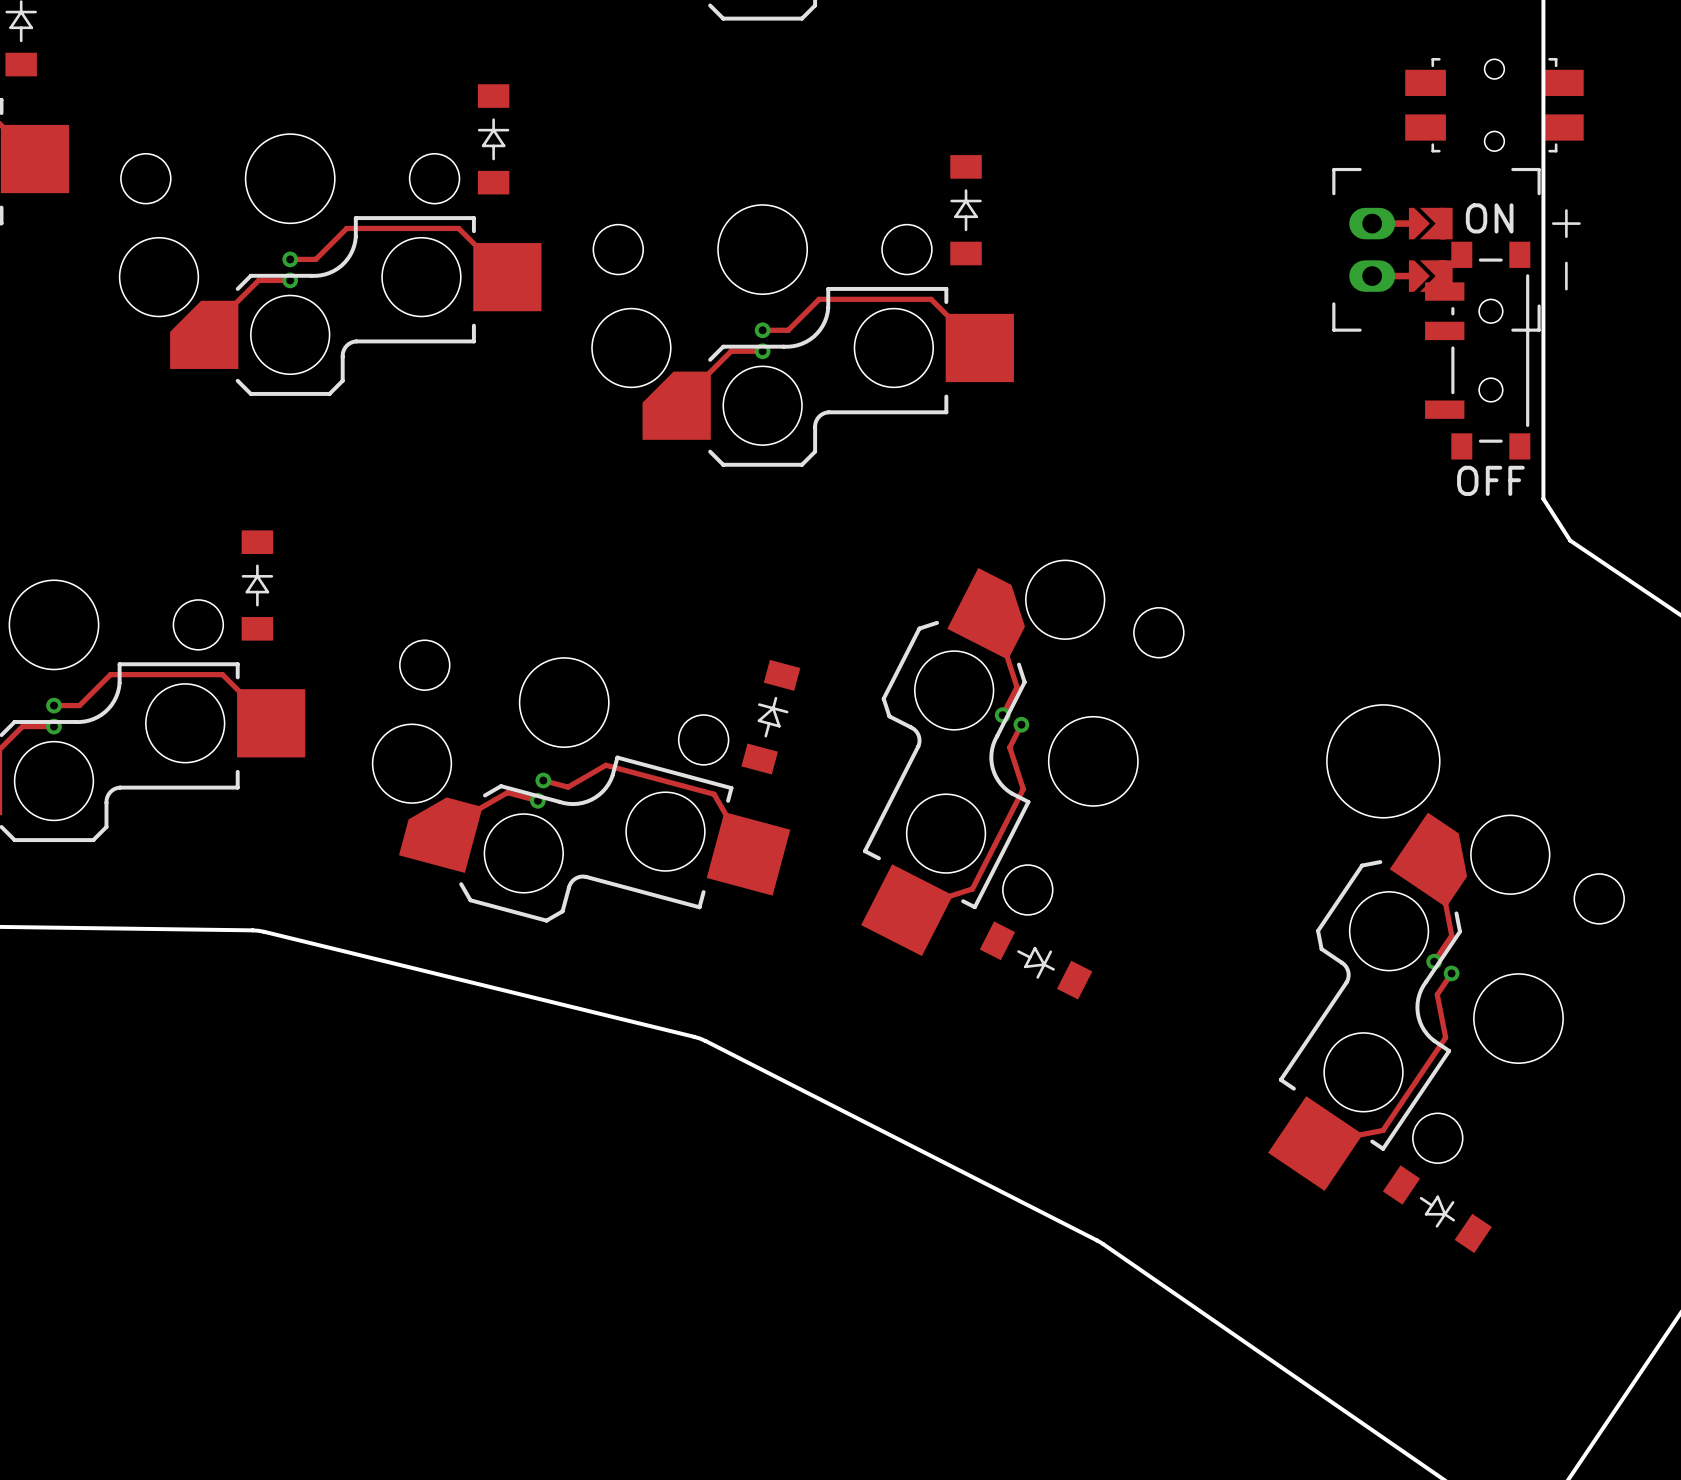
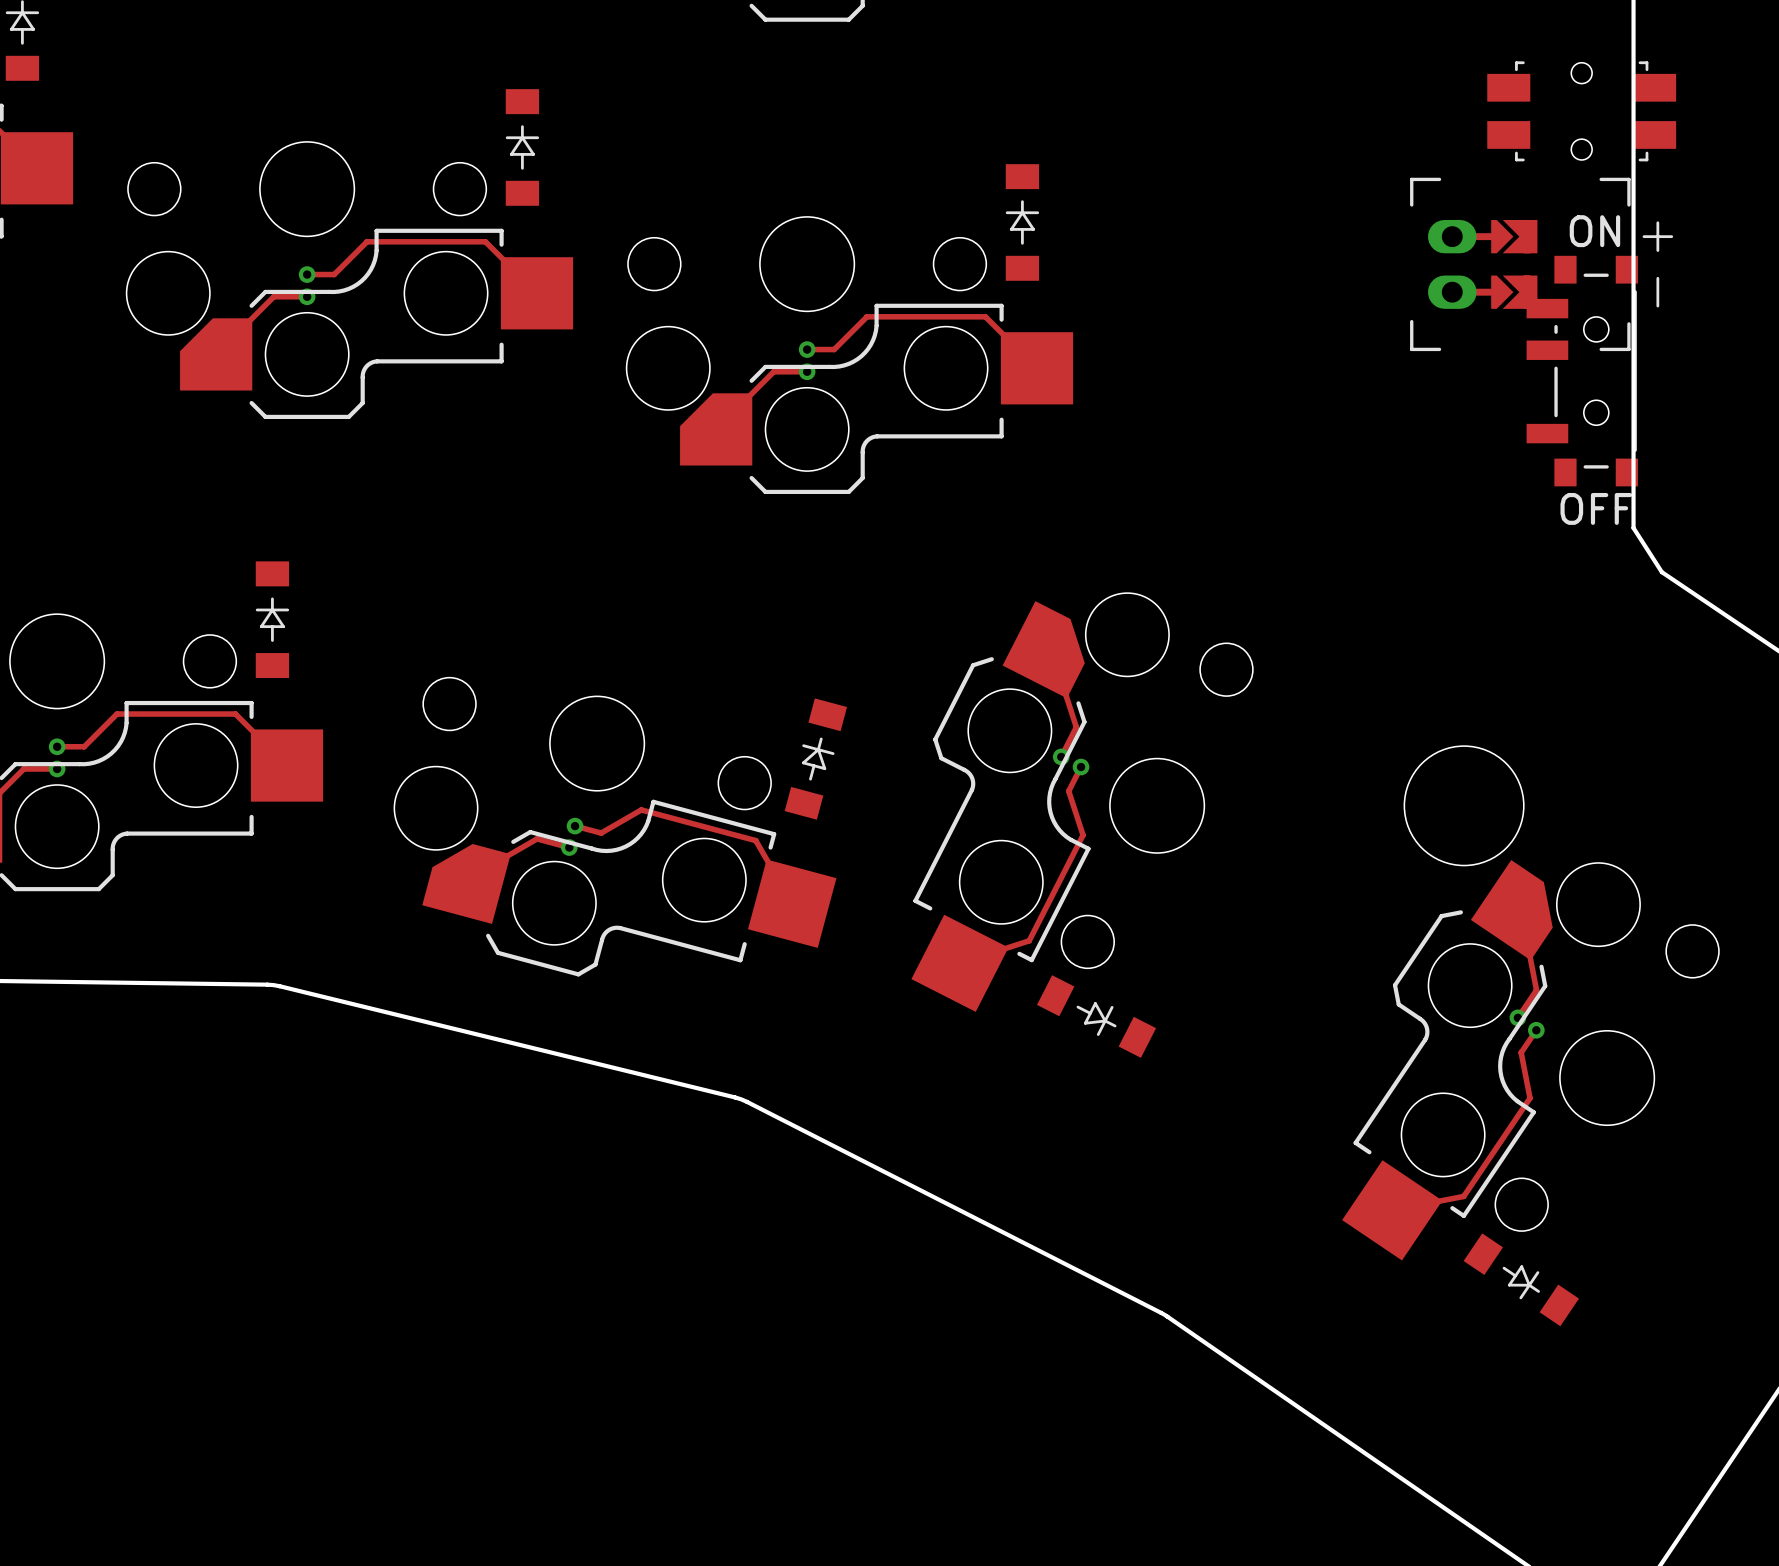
part position: (1477, 350) -> (1582, 371)

